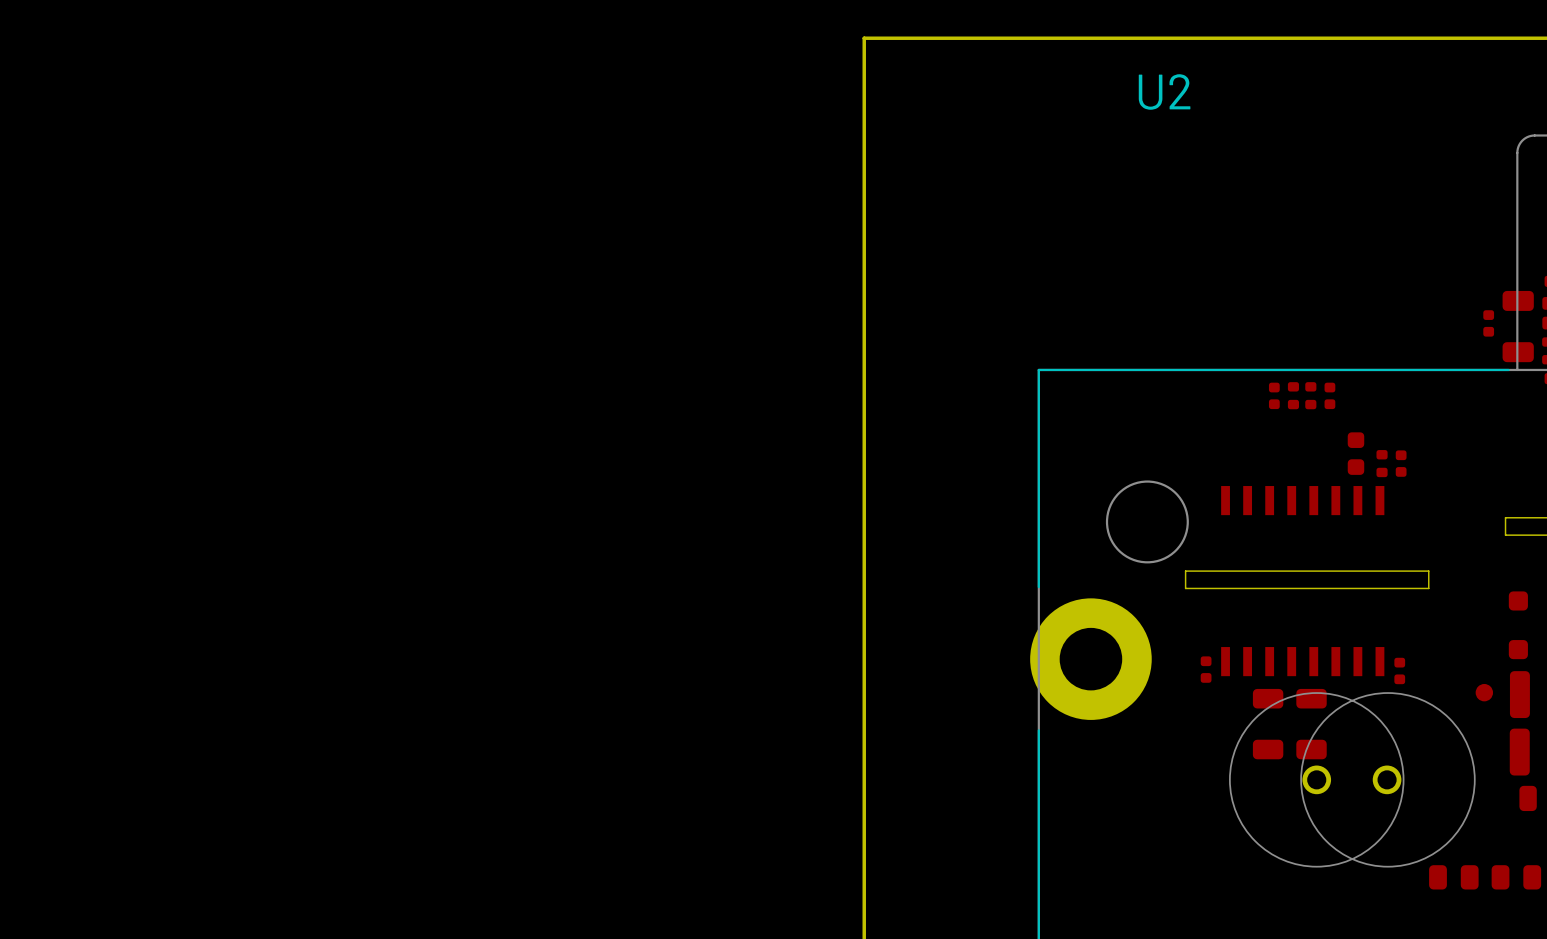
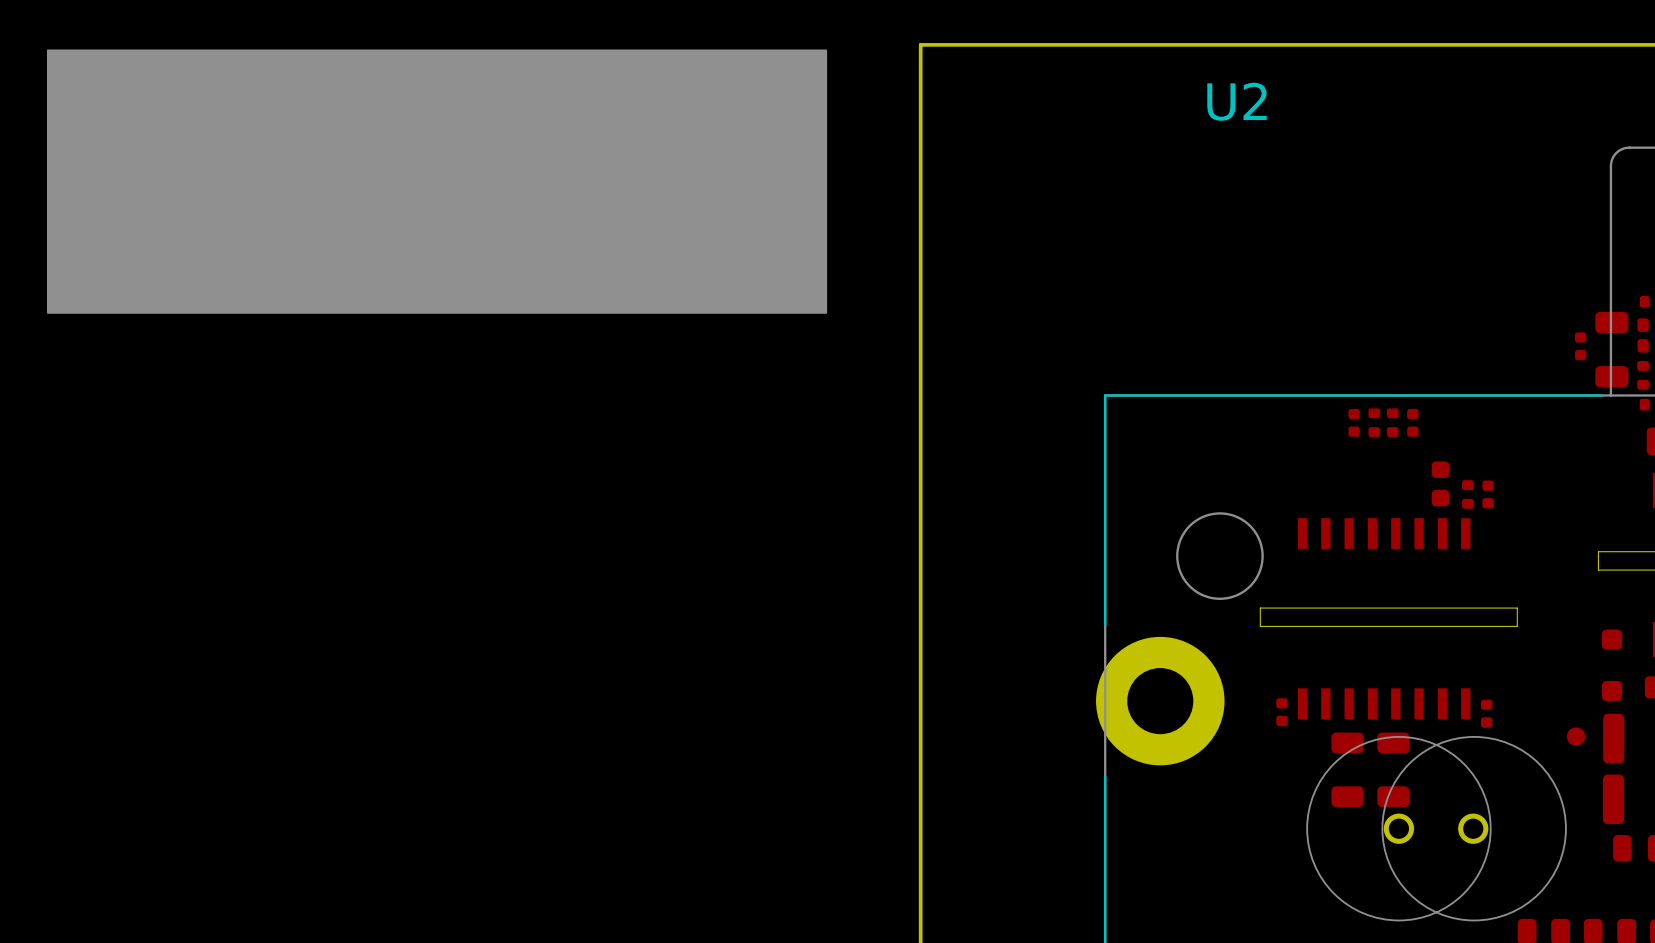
drawing: none -> [46, 49, 828, 314]

